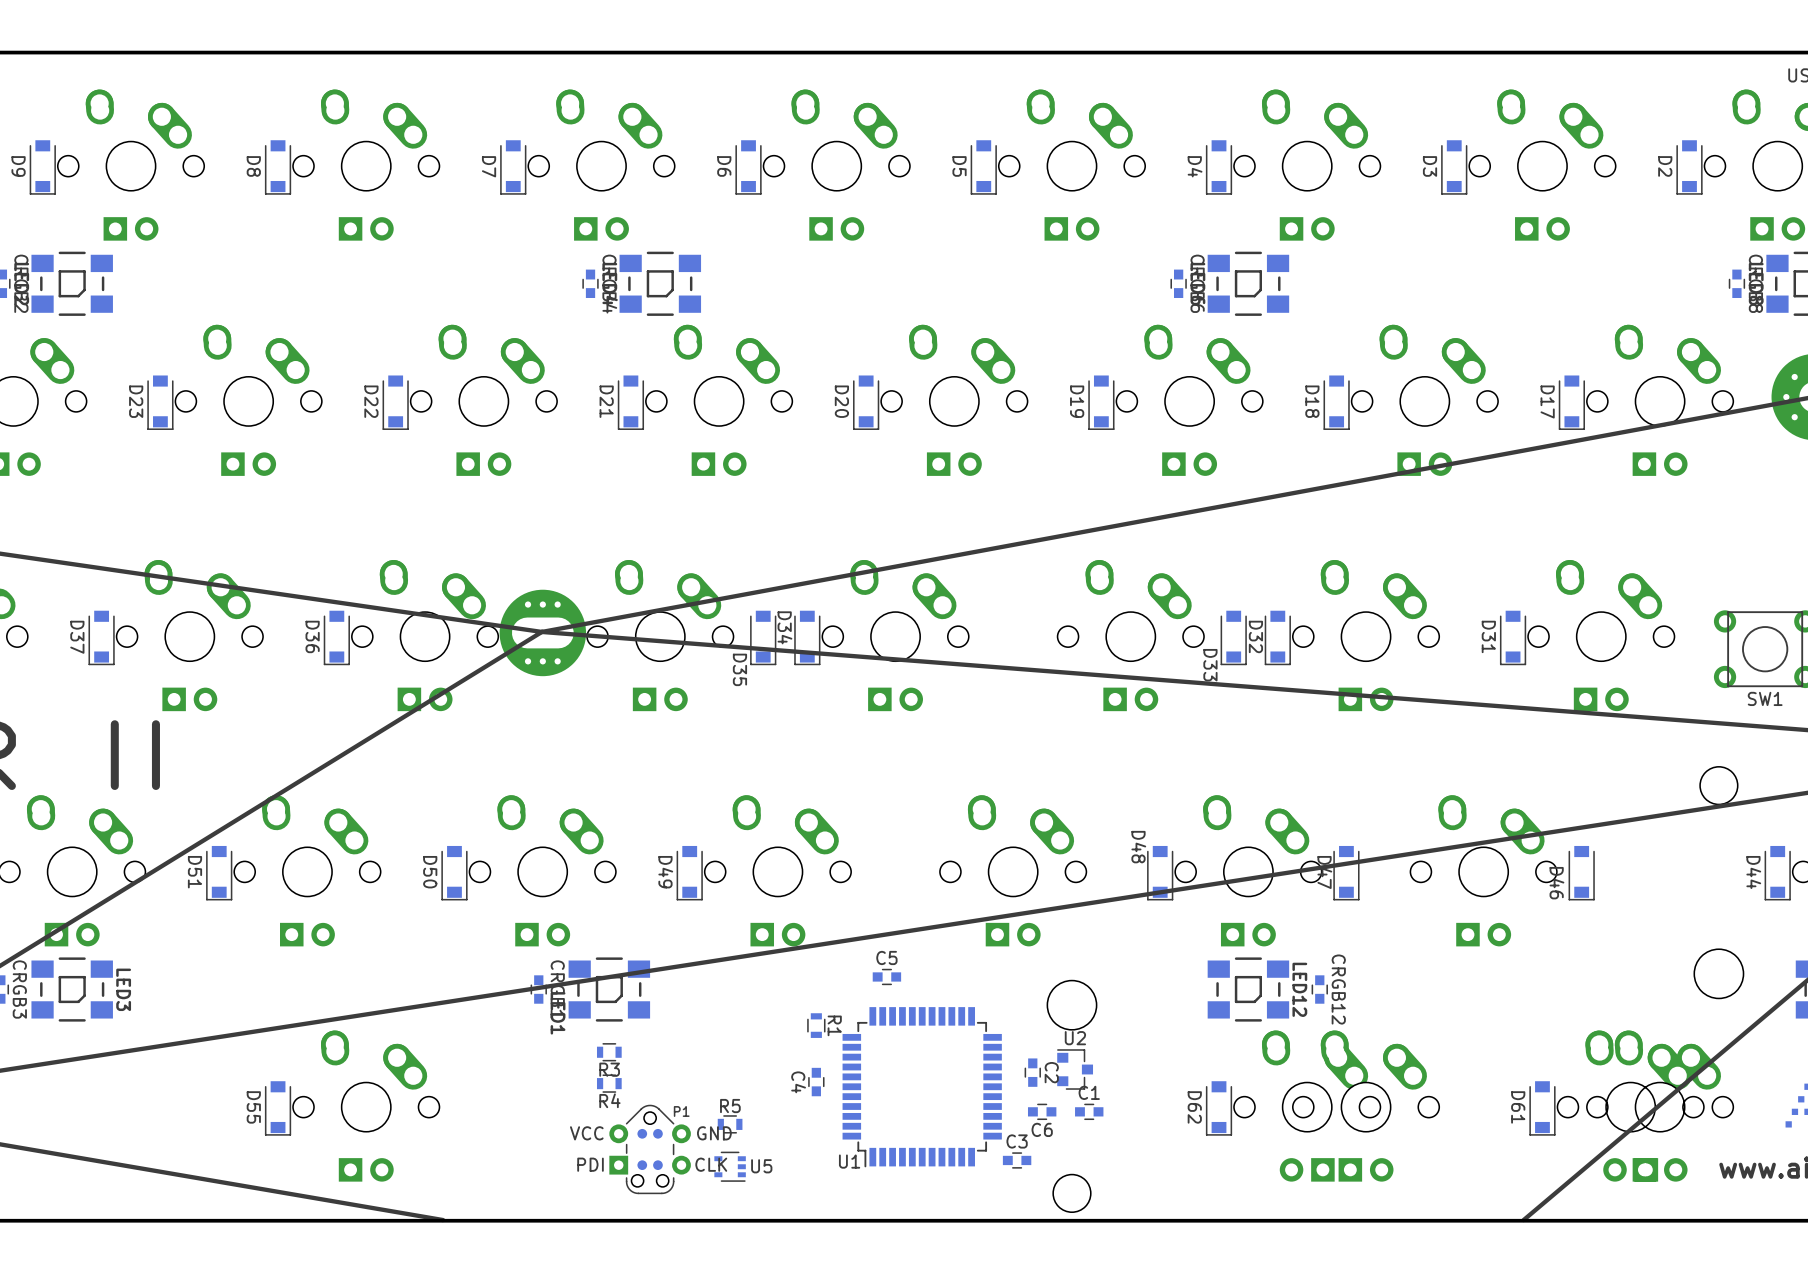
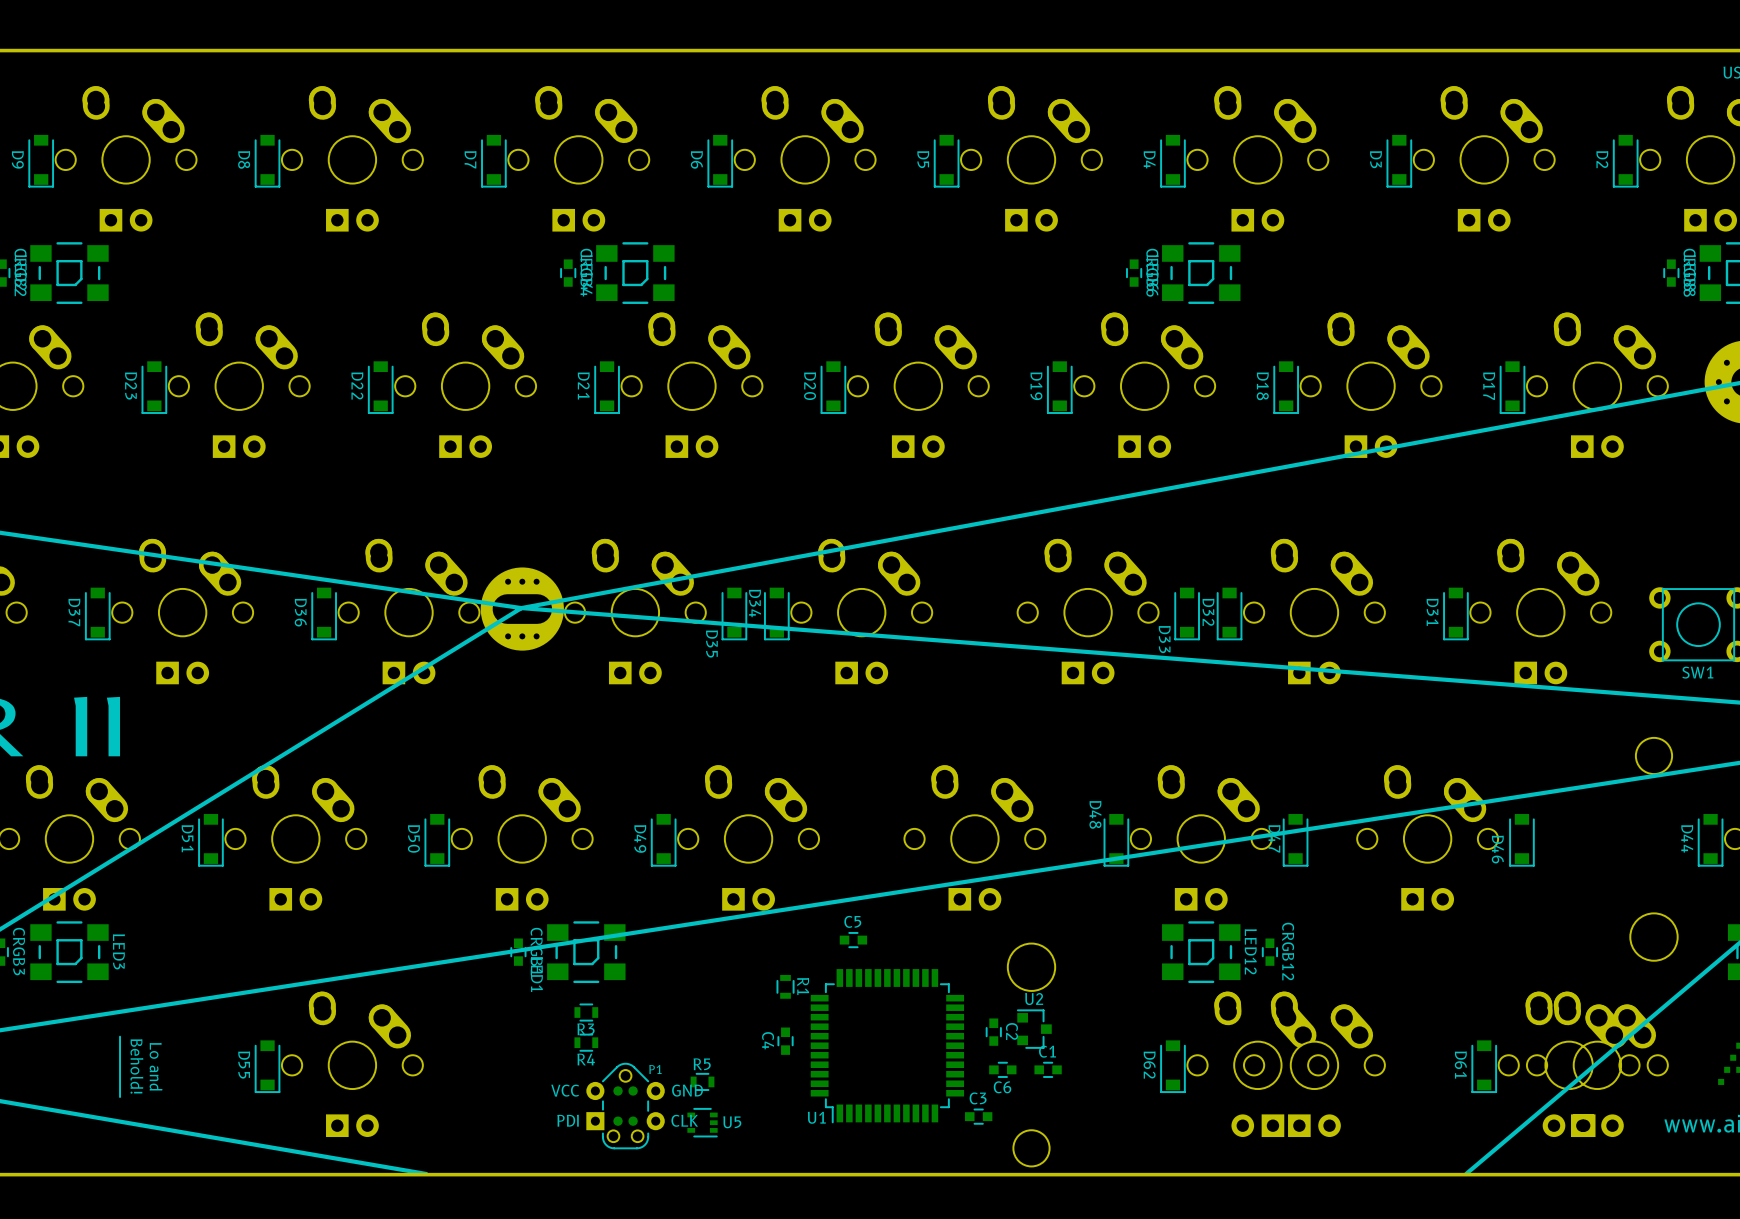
line: none -> (120, 1036) (120, 1097)
text: none -> Lo and (156, 1066)
text: none -> Behold! (136, 1066)

